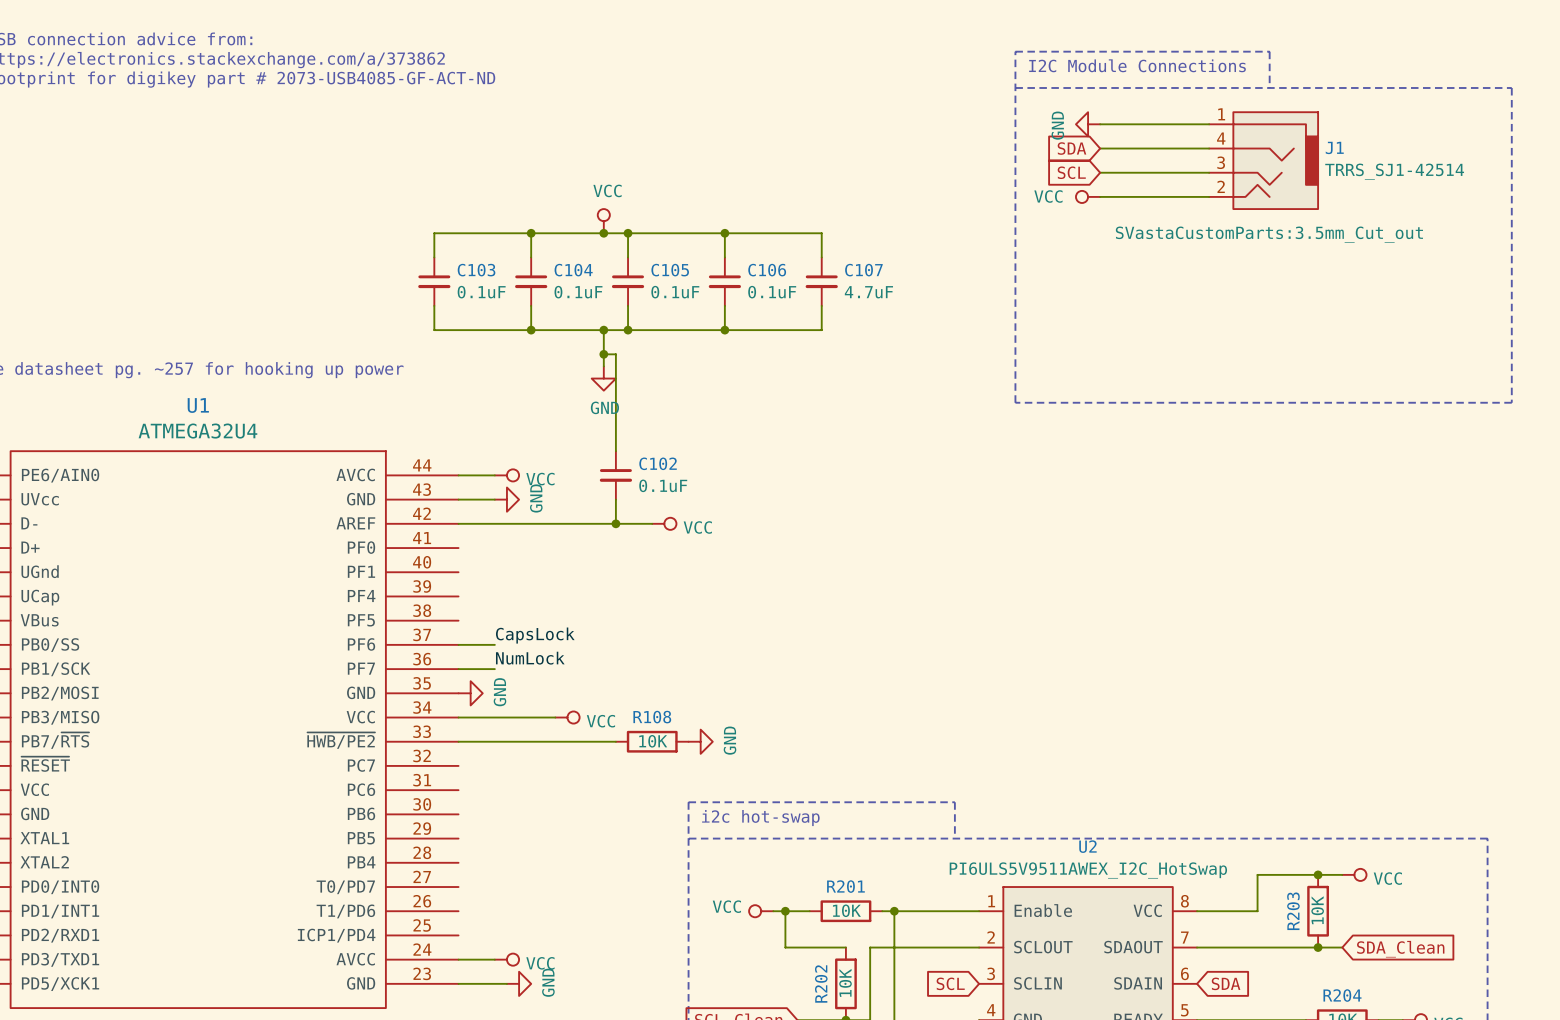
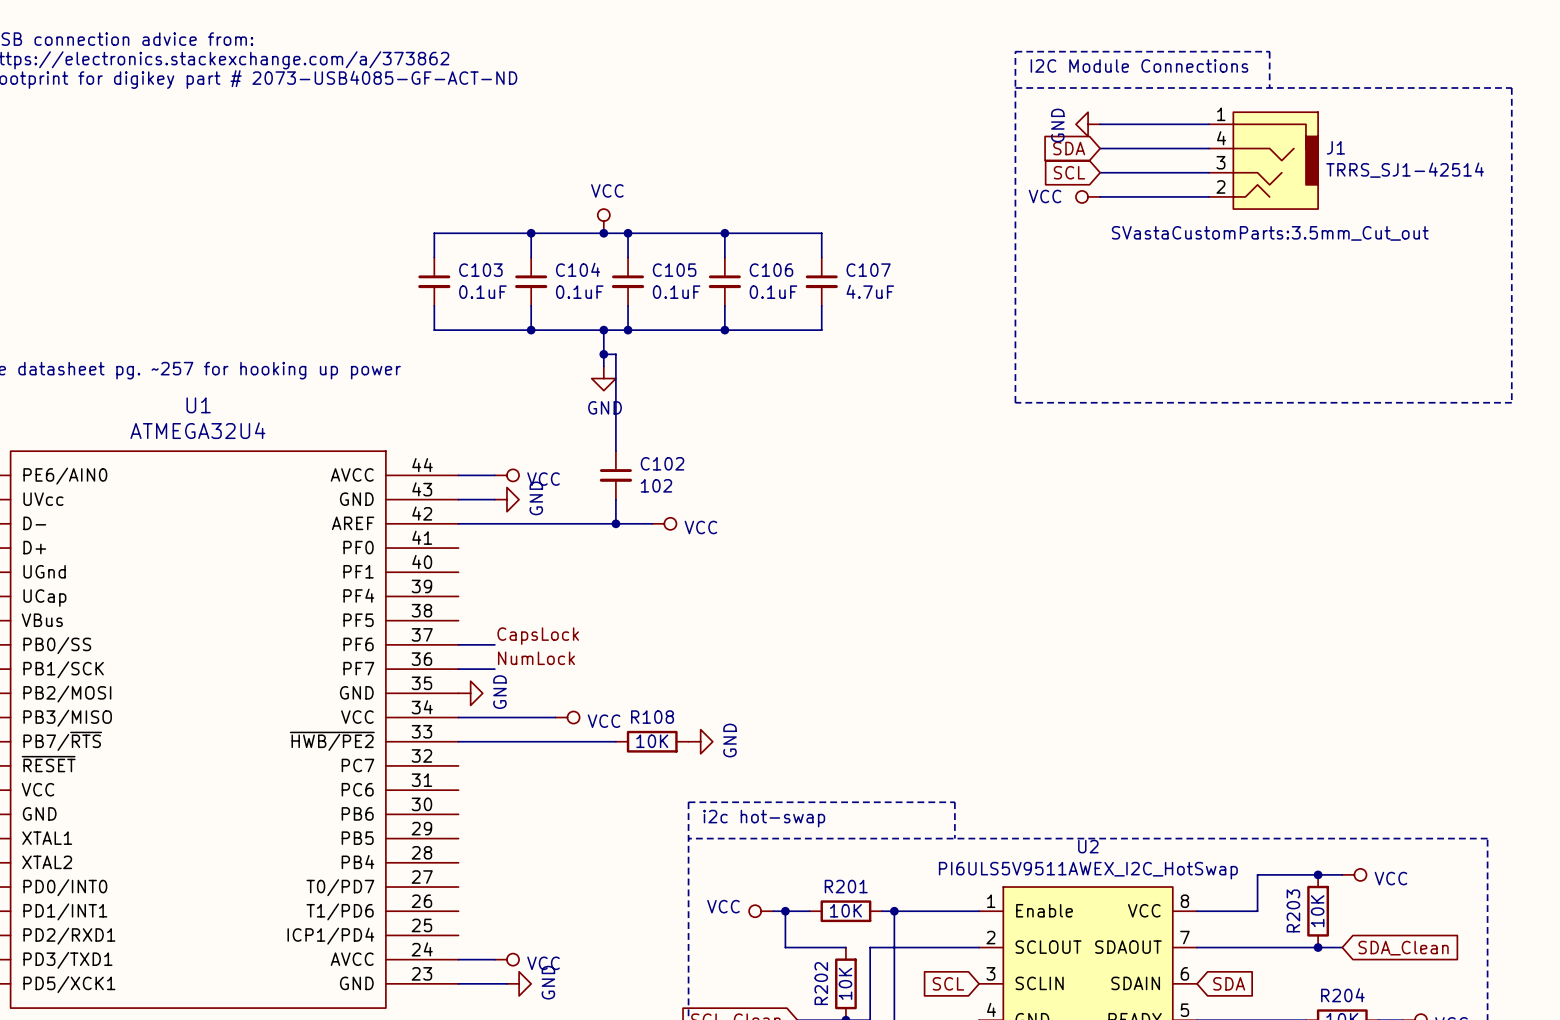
C102 value: 0.1uF (663, 485) -> 102 (656, 485)

